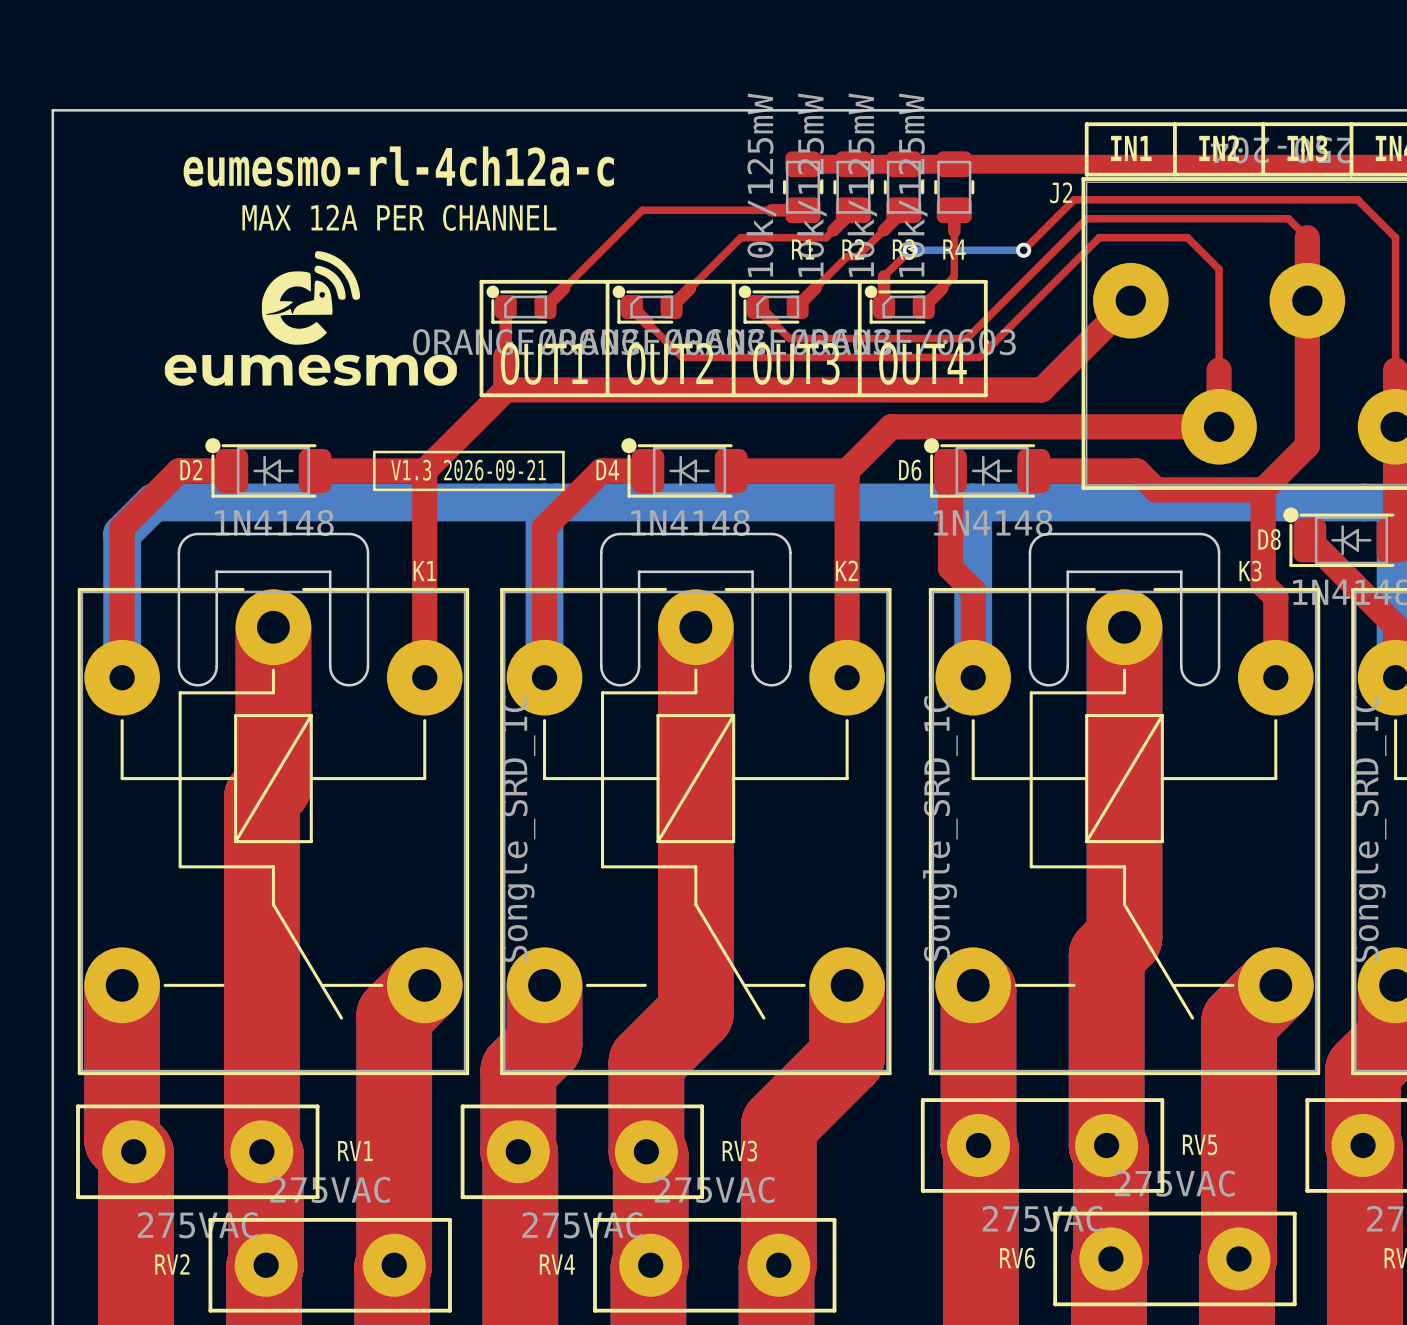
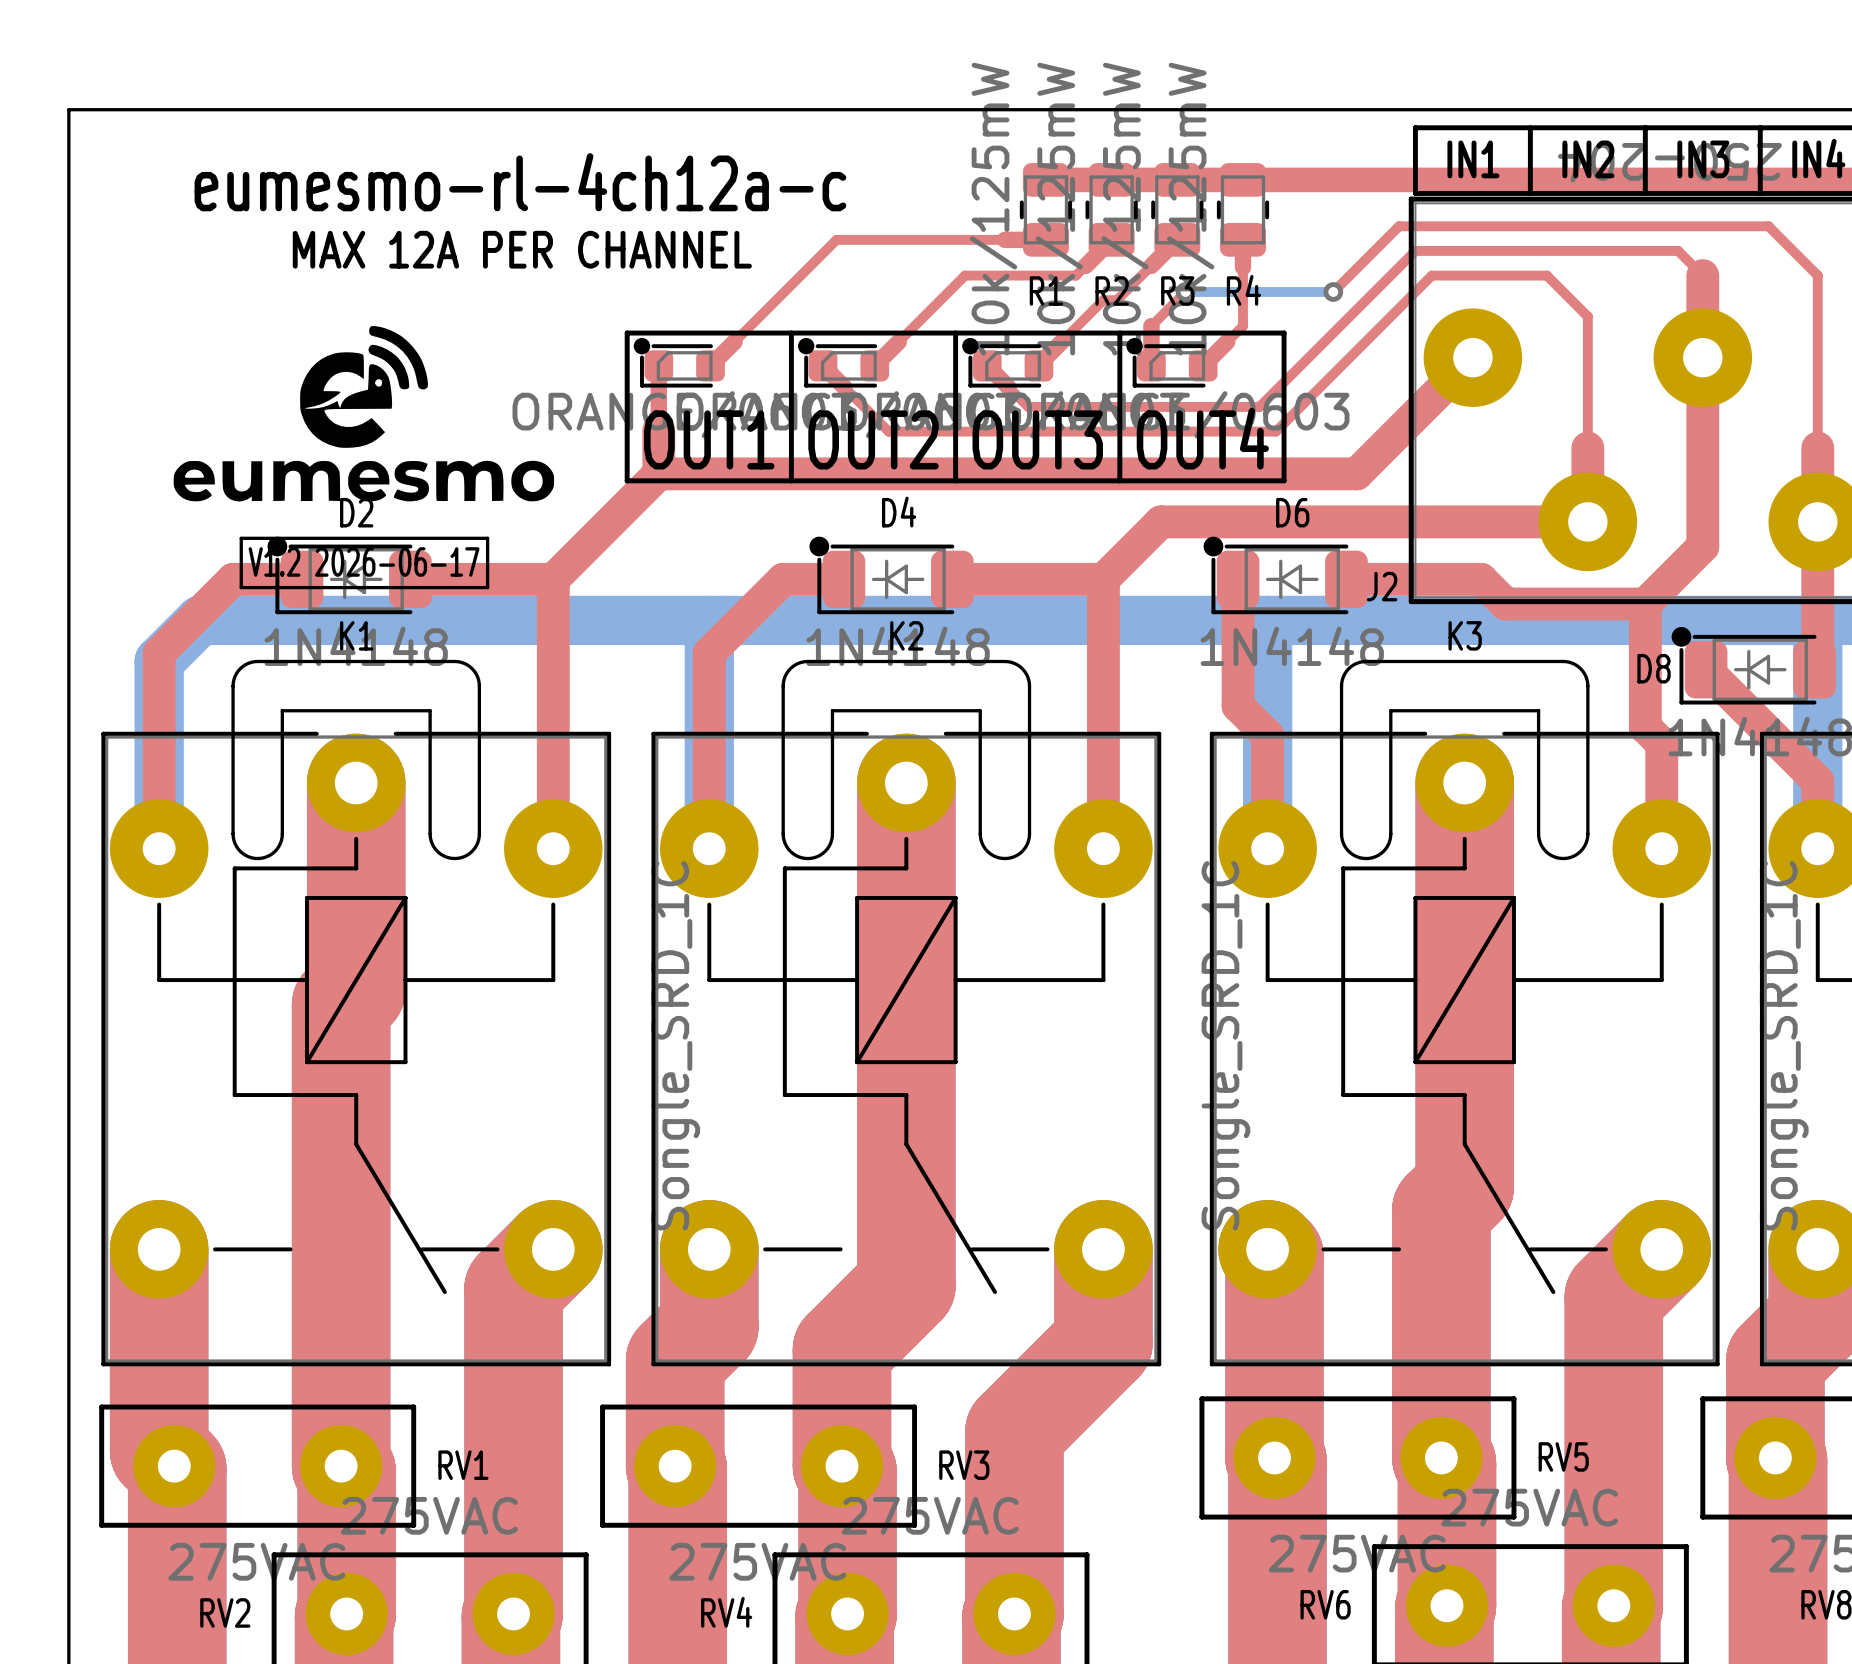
J2 name position: J2 (1061, 192) -> J2 (1382, 586)
drawing position: (310, 318) -> (363, 413)
line: (374, 452) (563, 452) (563, 489) (374, 489) (374, 477) -> (487, 554) (487, 538) (241, 538) (241, 587) (487, 587)
D2 name position: D2 (191, 470) -> D2 (356, 512)
text: V1.3 2026-09-21 (468, 470) -> V1.2 2026-06-17 (364, 561)
D4 name position: D4 (607, 470) -> D4 (899, 512)
D6 name position: D6 (910, 470) -> D6 (1292, 512)
K2 name position: K2 (846, 570) -> K2 (906, 635)
K1 name position: K1 (424, 571) -> K1 (356, 635)
K3 name position: K3 (1250, 571) -> K3 (1465, 635)

